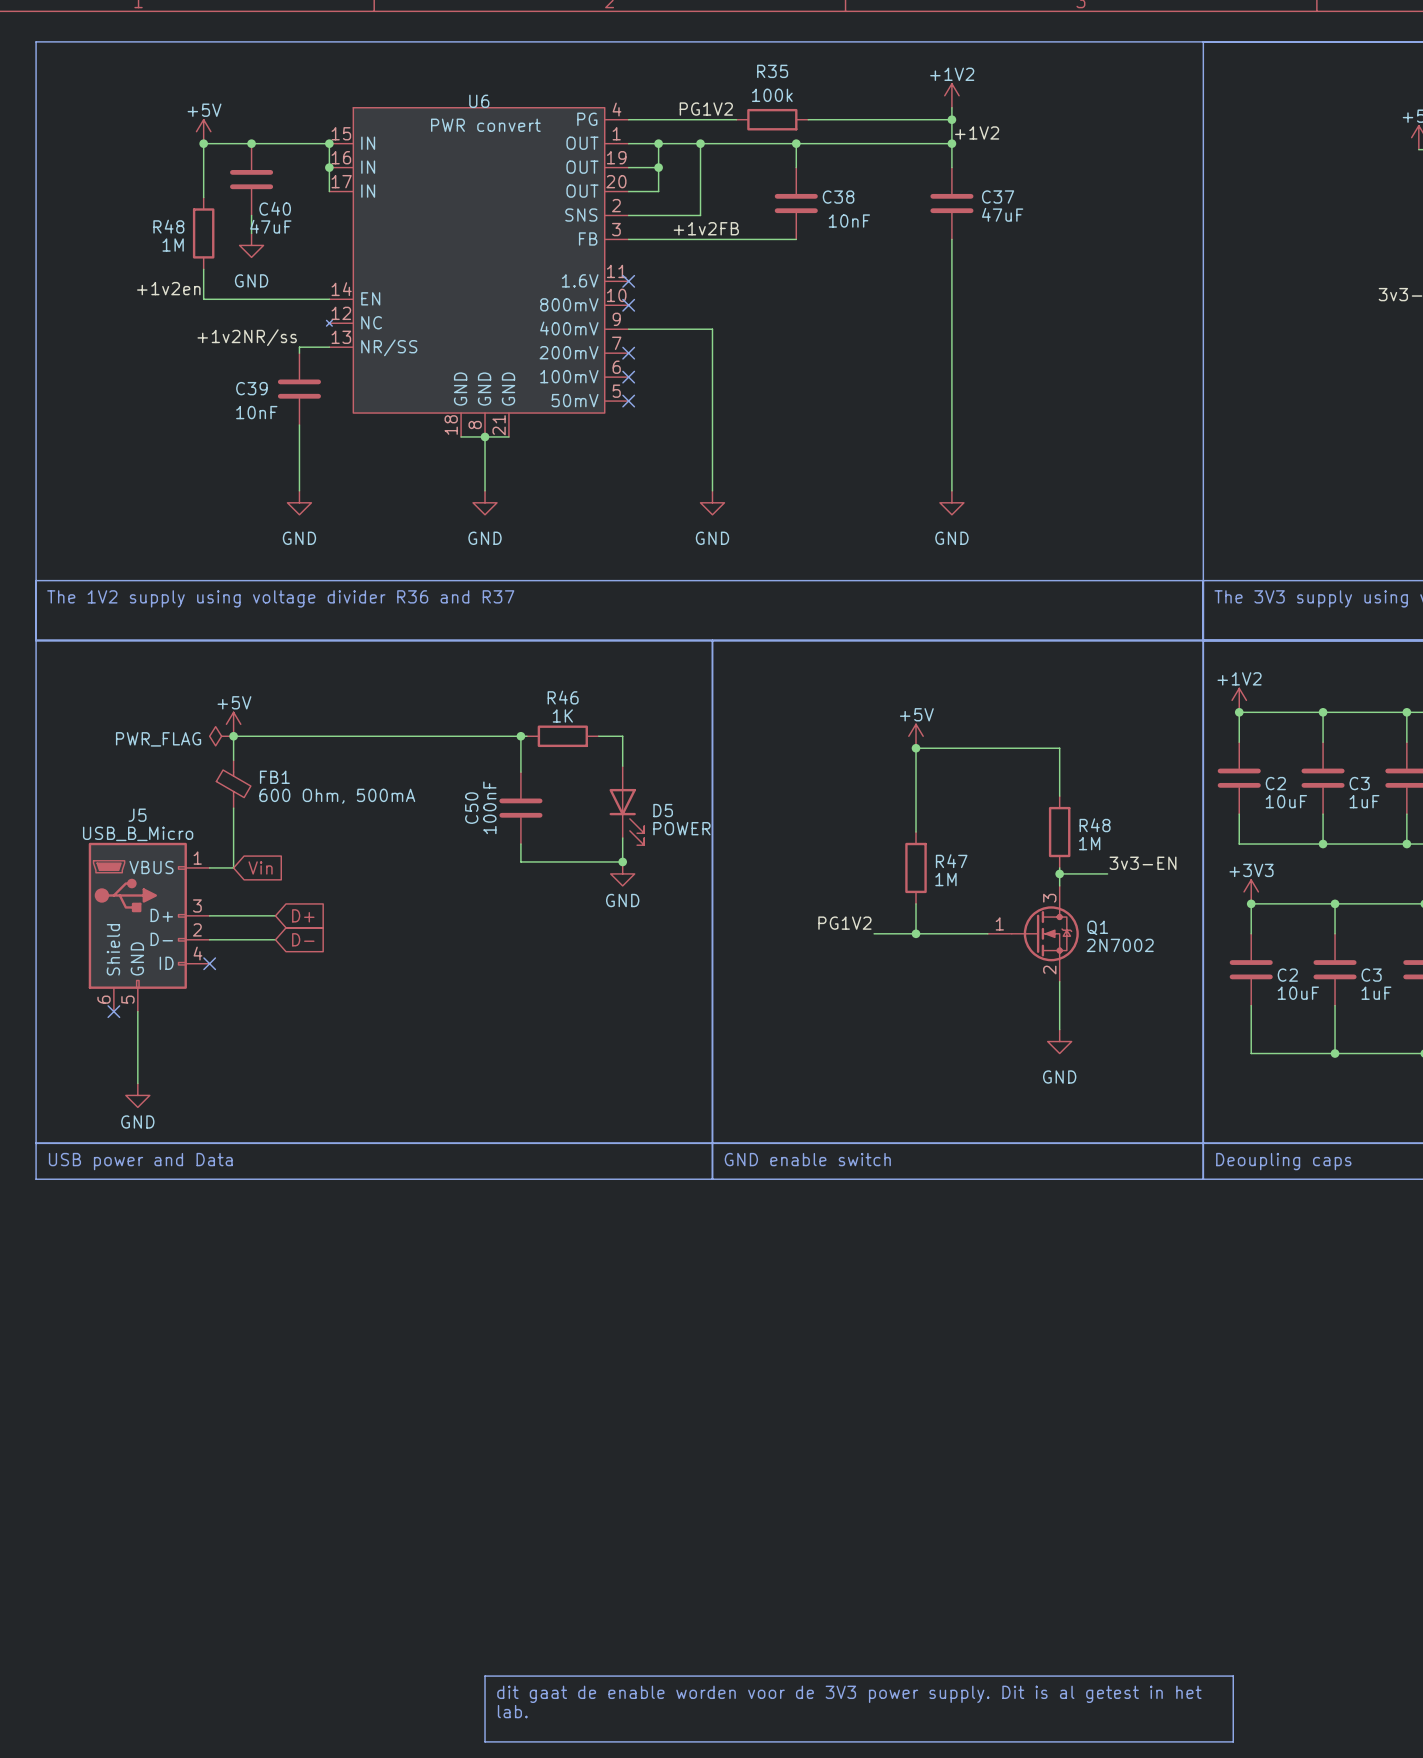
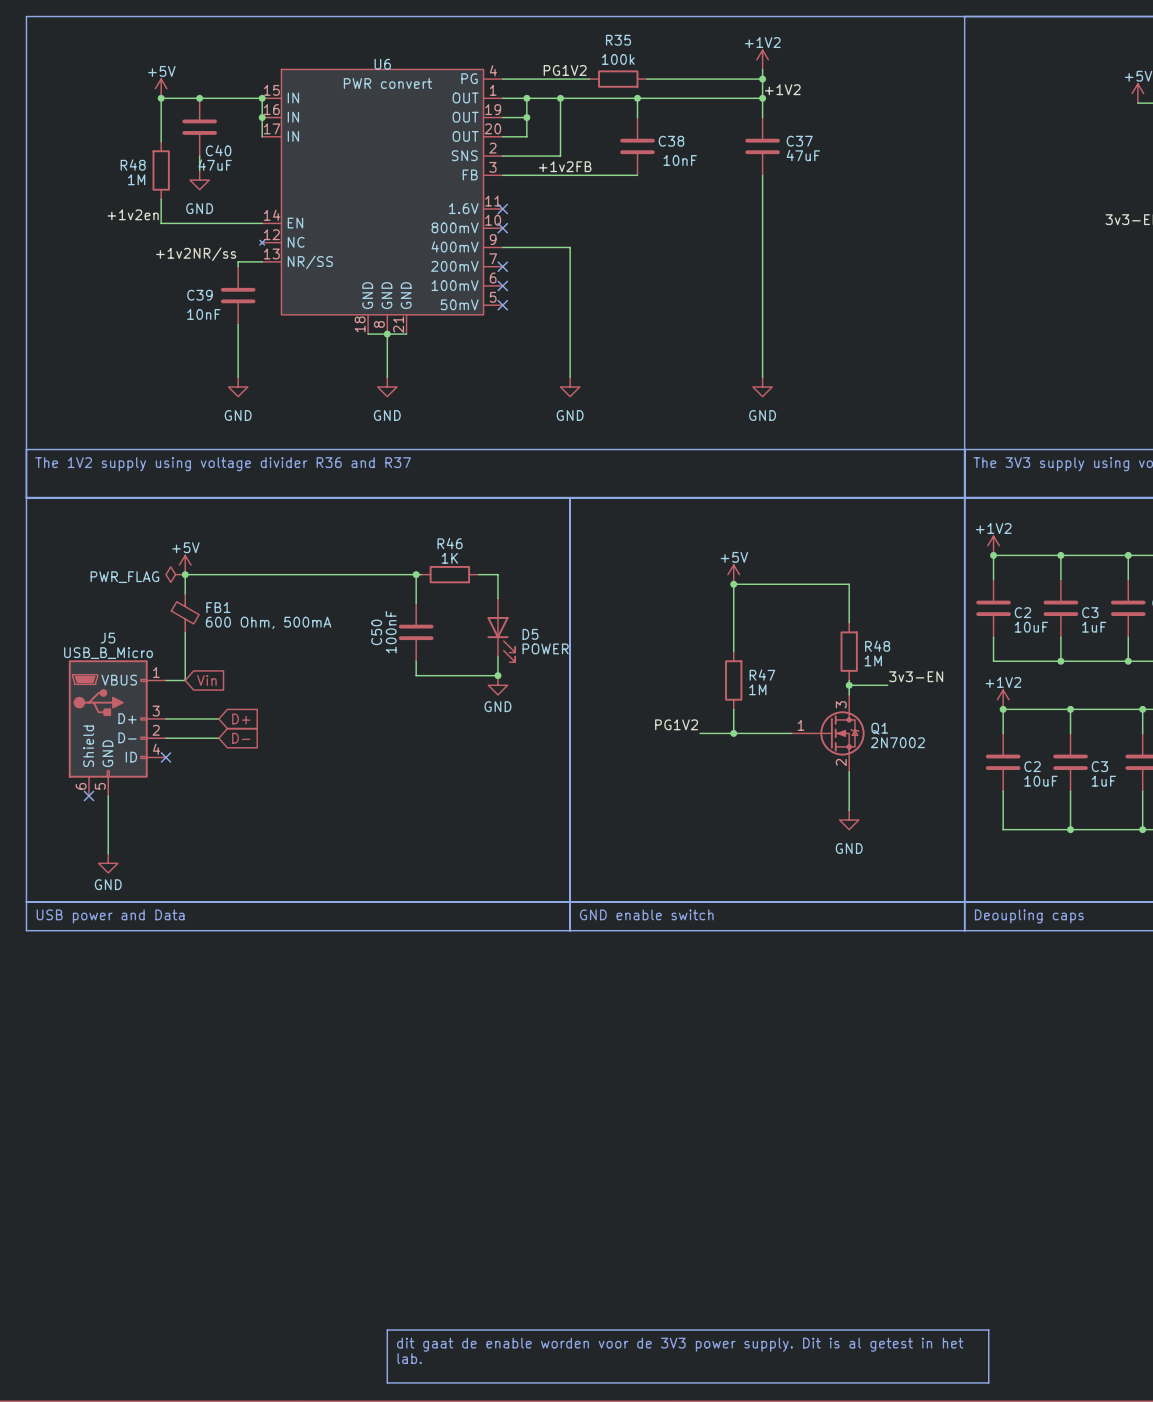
power symbol: +3V3 (1251, 891) -> +1V2 (1003, 699)

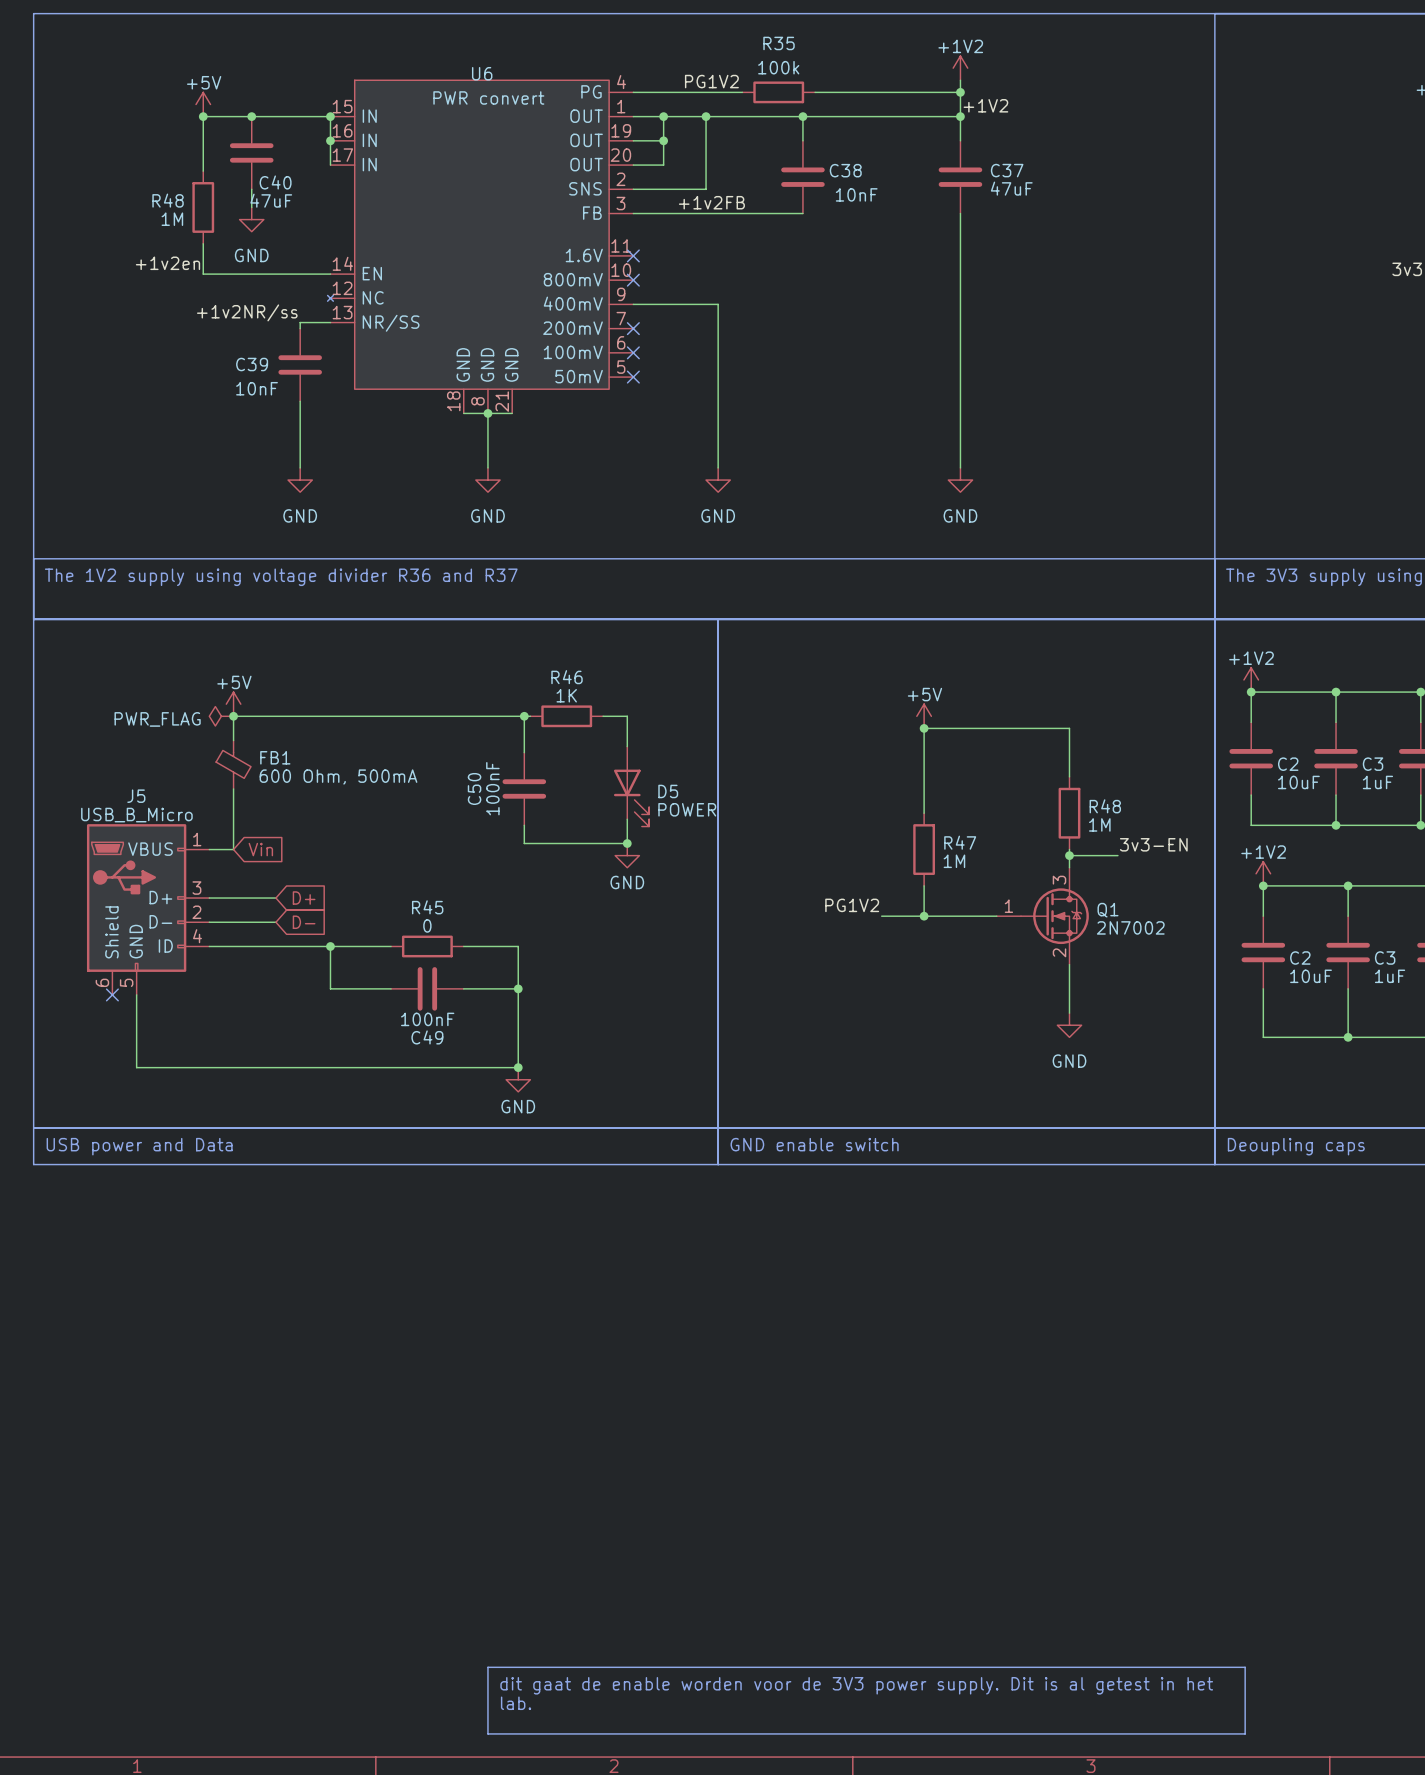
wire: none -> (209, 946) (391, 946)
no-connect mark: (165, 757) -> none
wire: none -> (330, 946) (330, 988) (391, 988)
junction: none -> (330, 946)
R45: none -> 0 (427, 946)
wire: none -> (463, 946) (518, 946) (518, 1067) (136, 1067)
C49: none -> 100nF (427, 988)
wire: none -> (463, 988) (518, 988)
junction: none -> (518, 988)
junction: none -> (518, 1067)
power symbol: GND (108, 863) -> none
power symbol: none -> GND (518, 1079)

